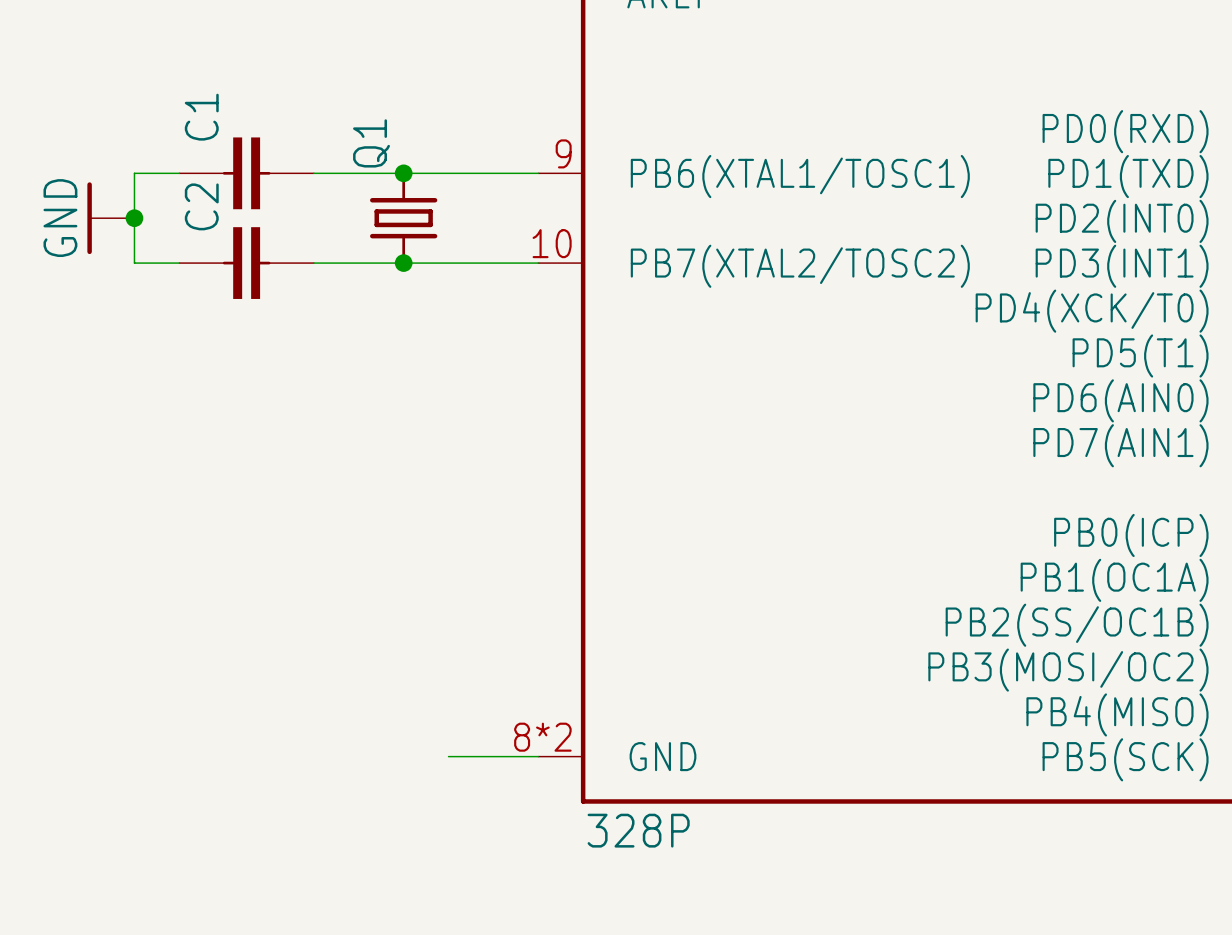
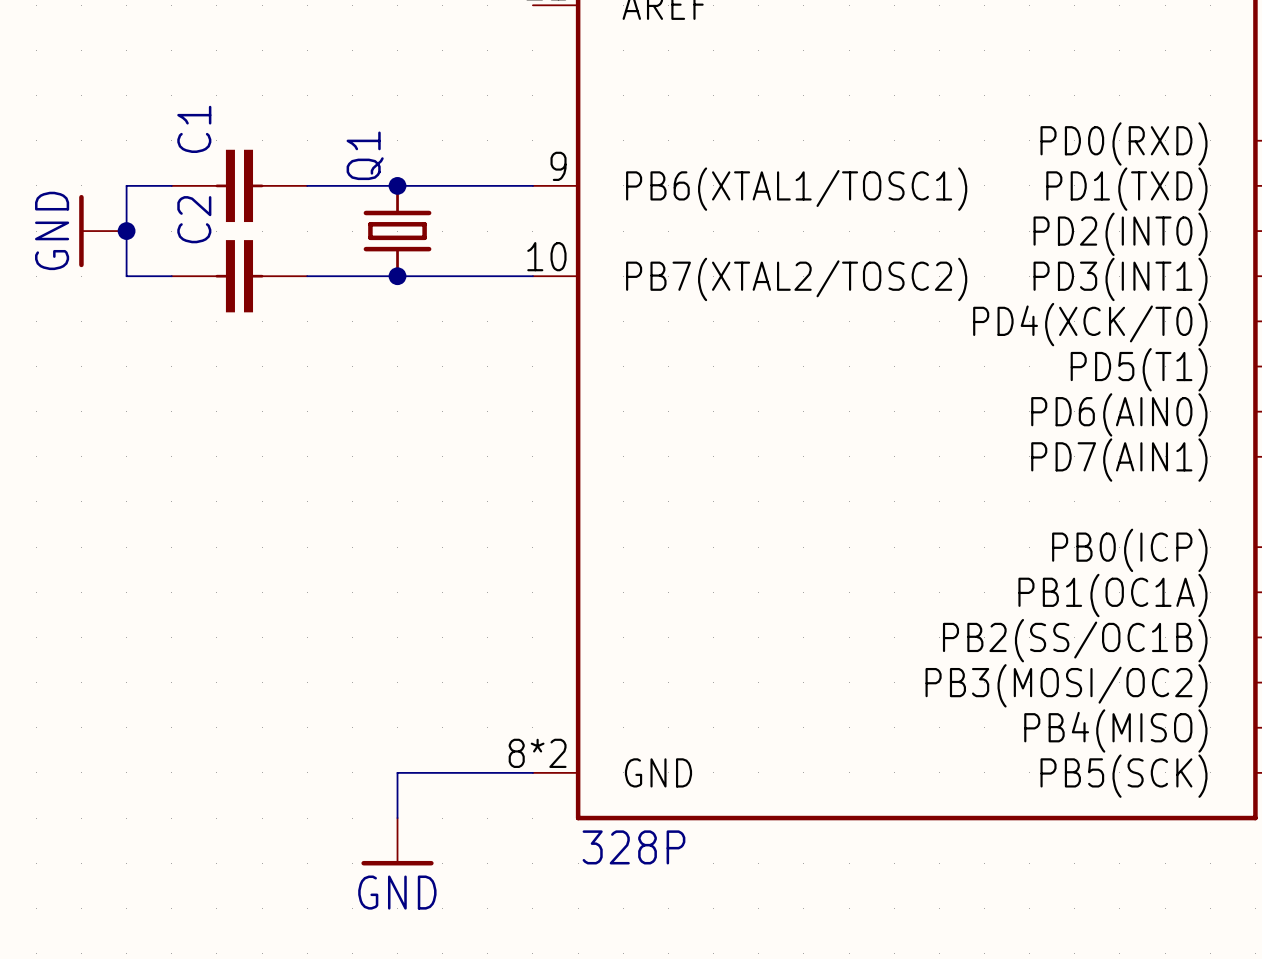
wire: none -> (442, 772) (397, 772) (397, 818)
power symbol: none -> GND (397, 841)

